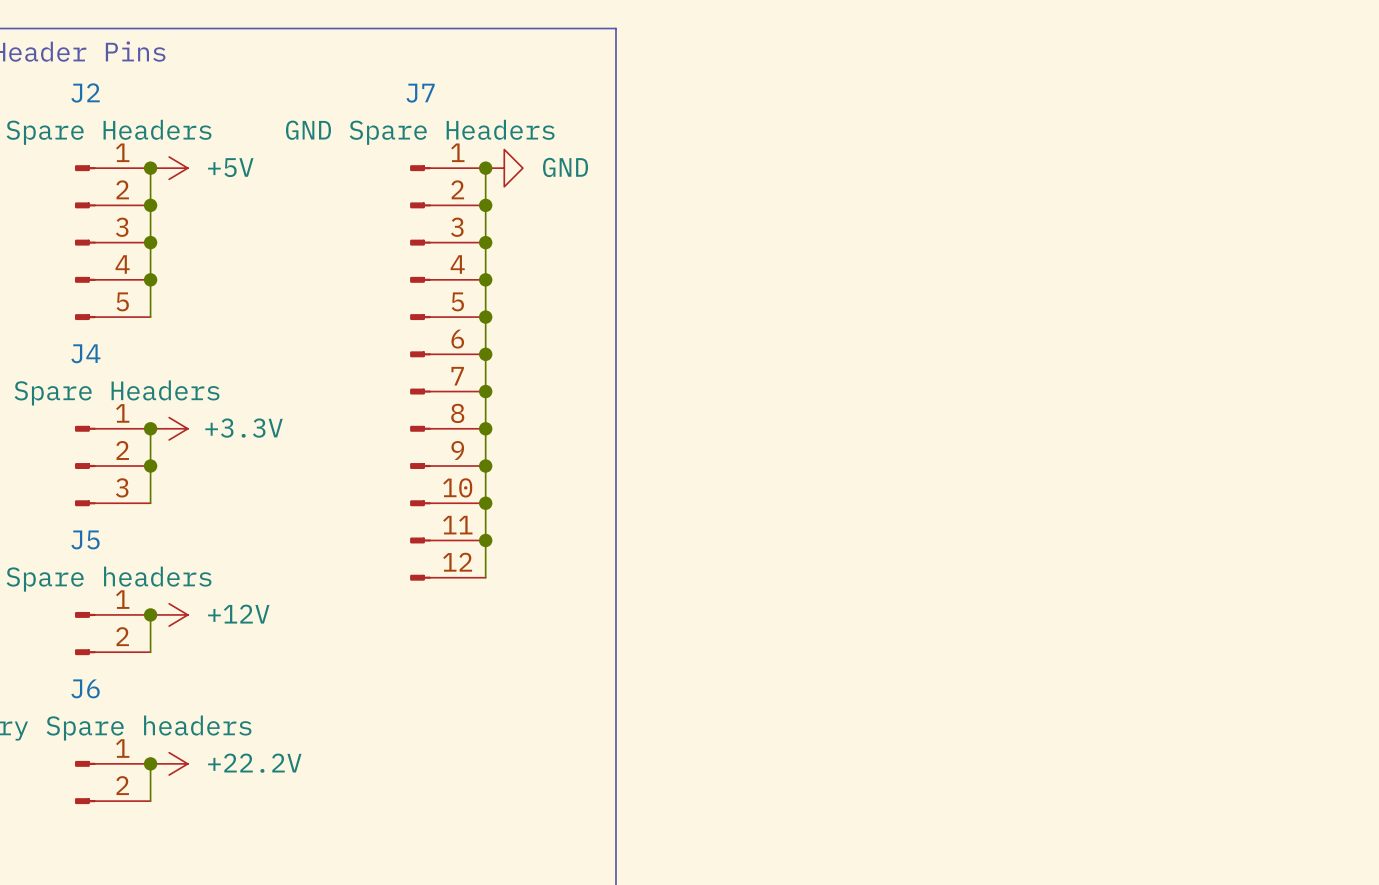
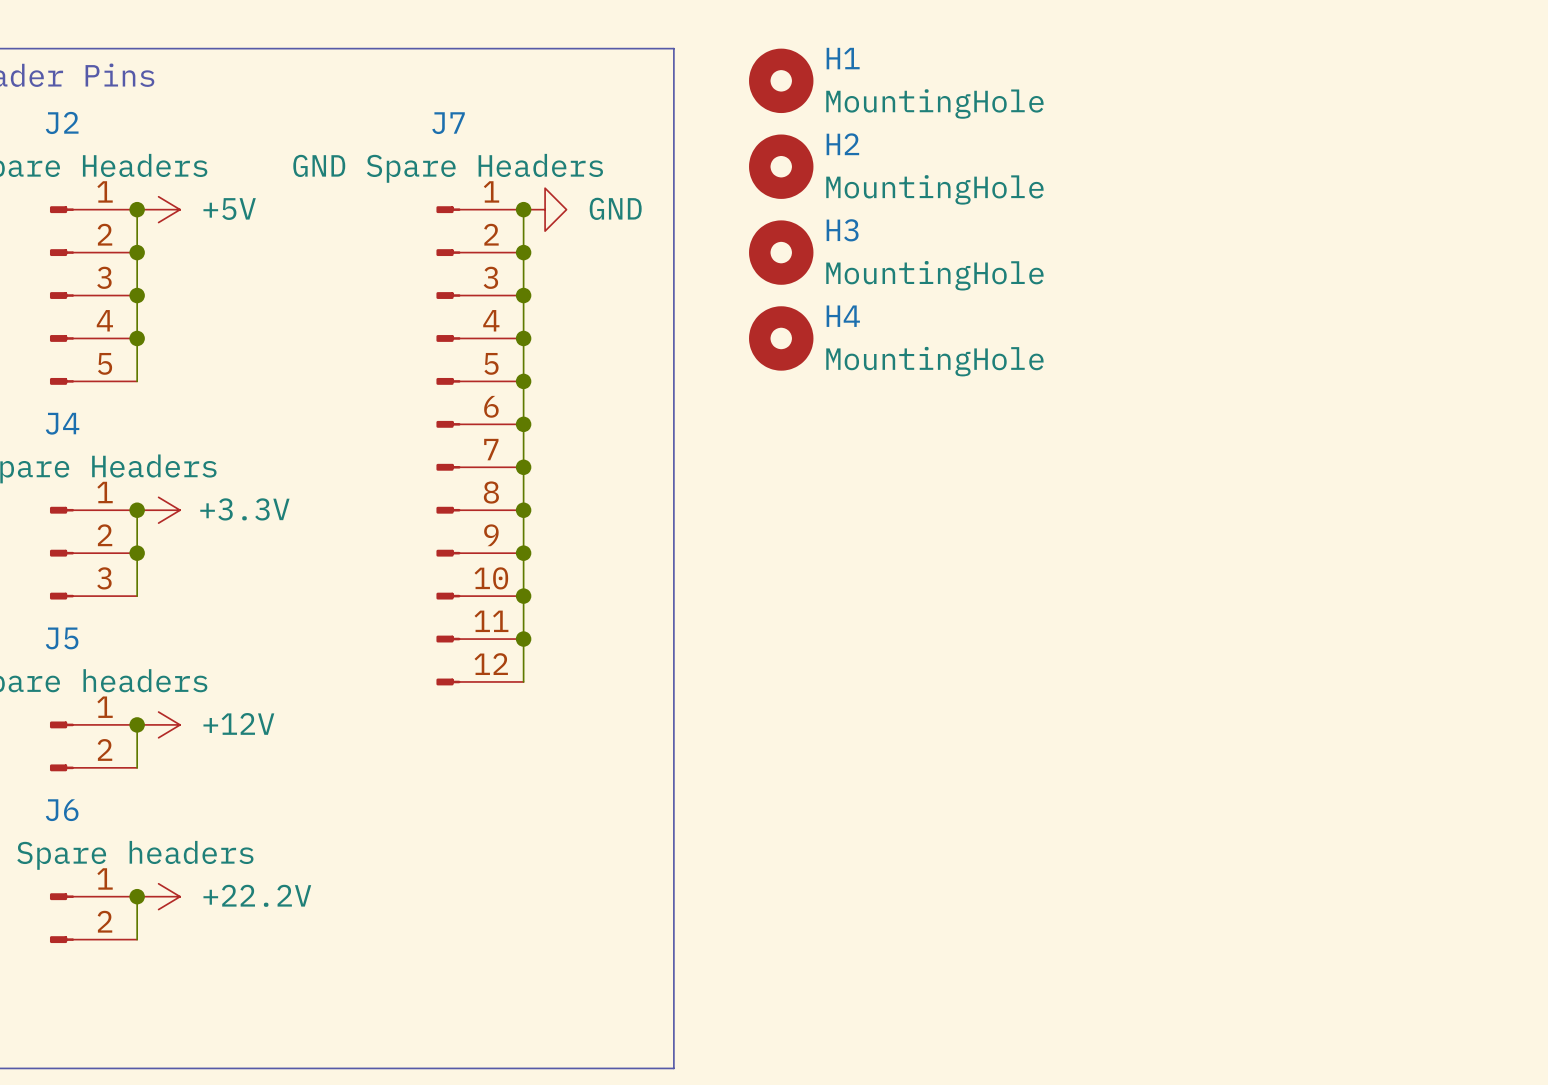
H1: none -> MountingHole (781, 80)
H2: none -> MountingHole (781, 166)
H3: none -> MountingHole (781, 252)
H4: none -> MountingHole (781, 338)

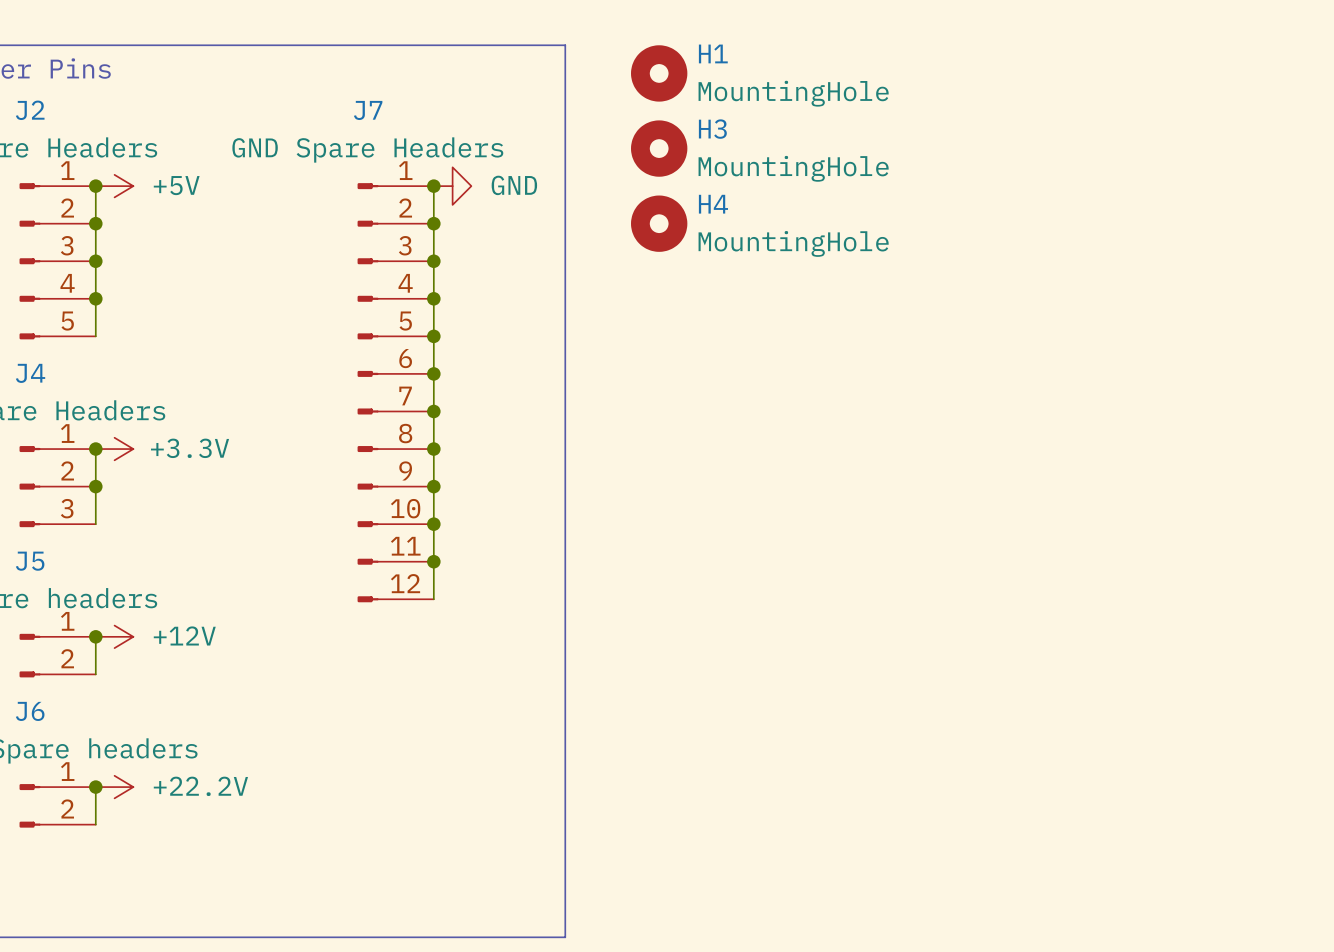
H2 name: H2 (842, 144) -> H3 (712, 129)
H3 name: H3 (842, 230) -> H4 (713, 204)
H4: MountingHole (781, 338) -> none

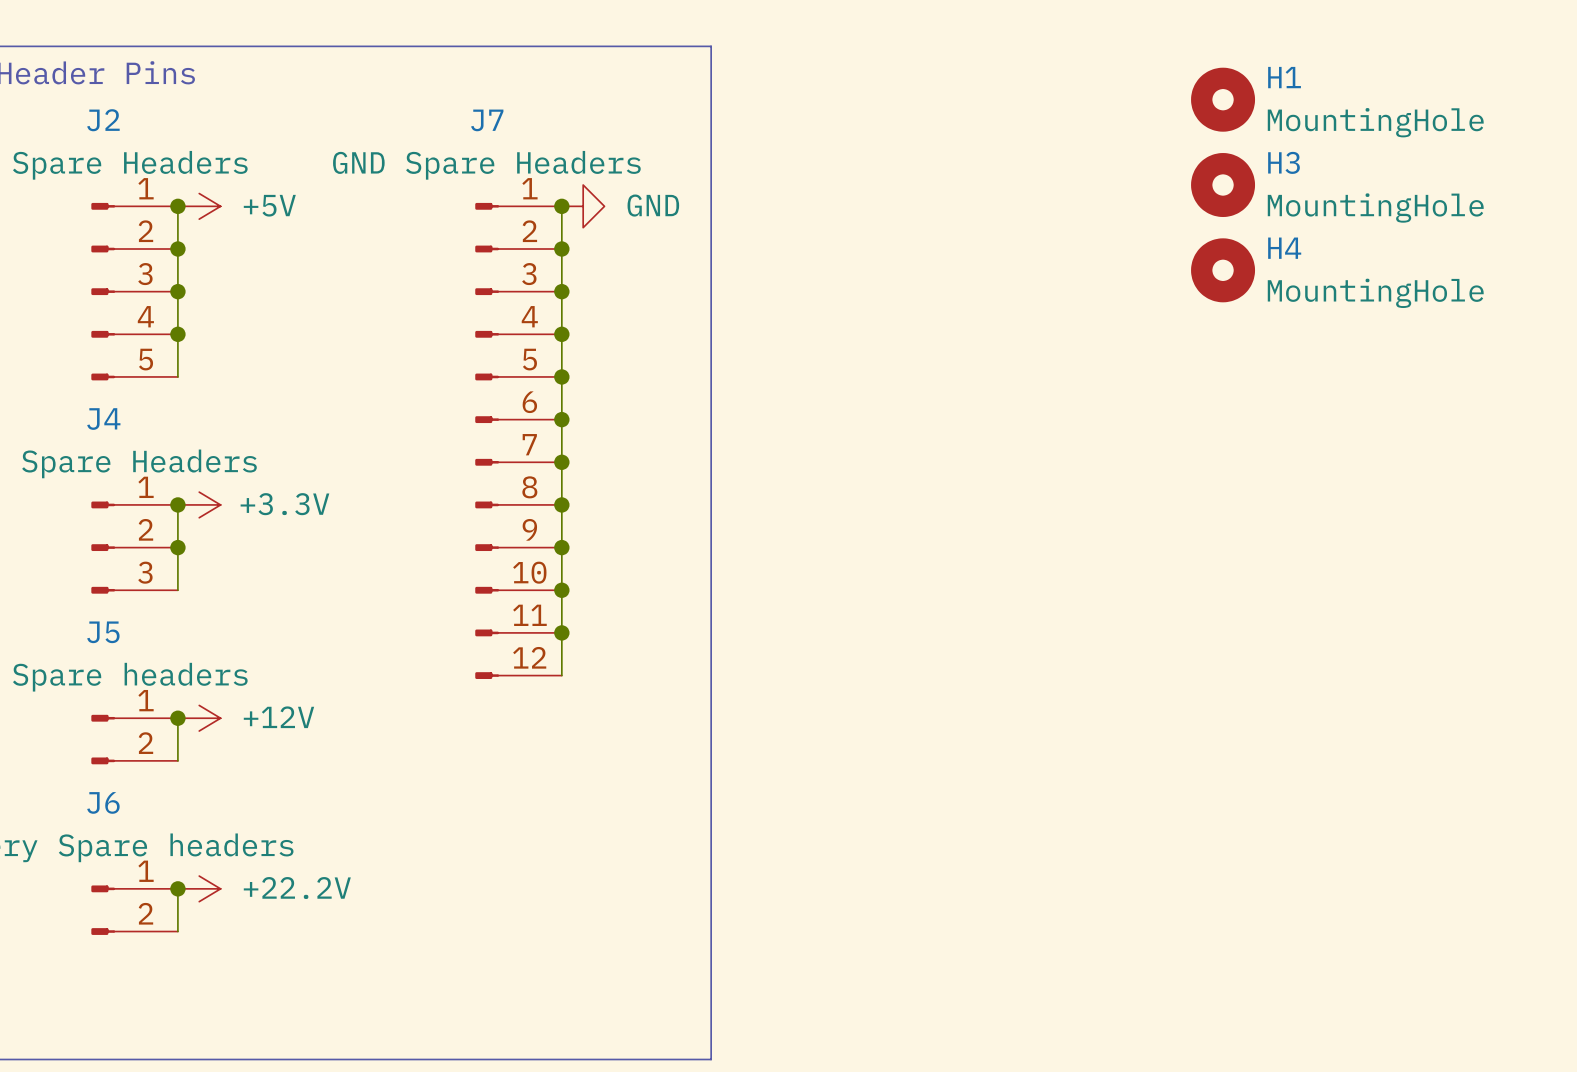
H1 position: (659, 73) -> (1223, 99)
H3 position: (659, 148) -> (1223, 185)
H4 position: (659, 223) -> (1223, 270)

